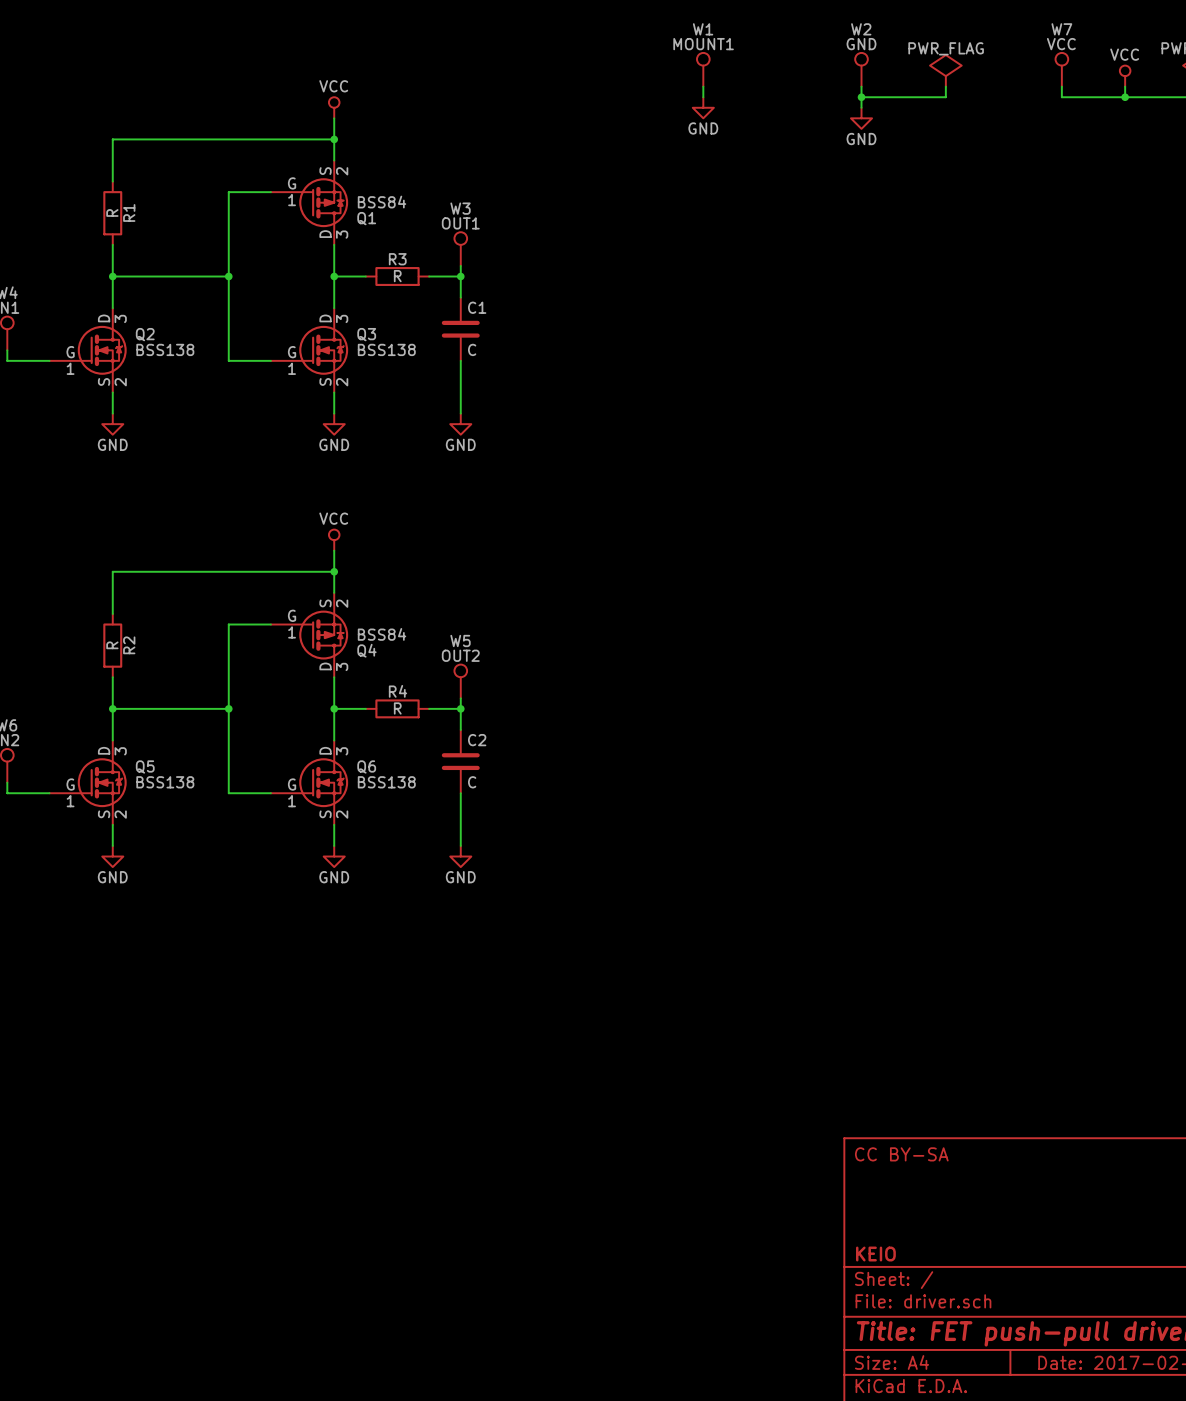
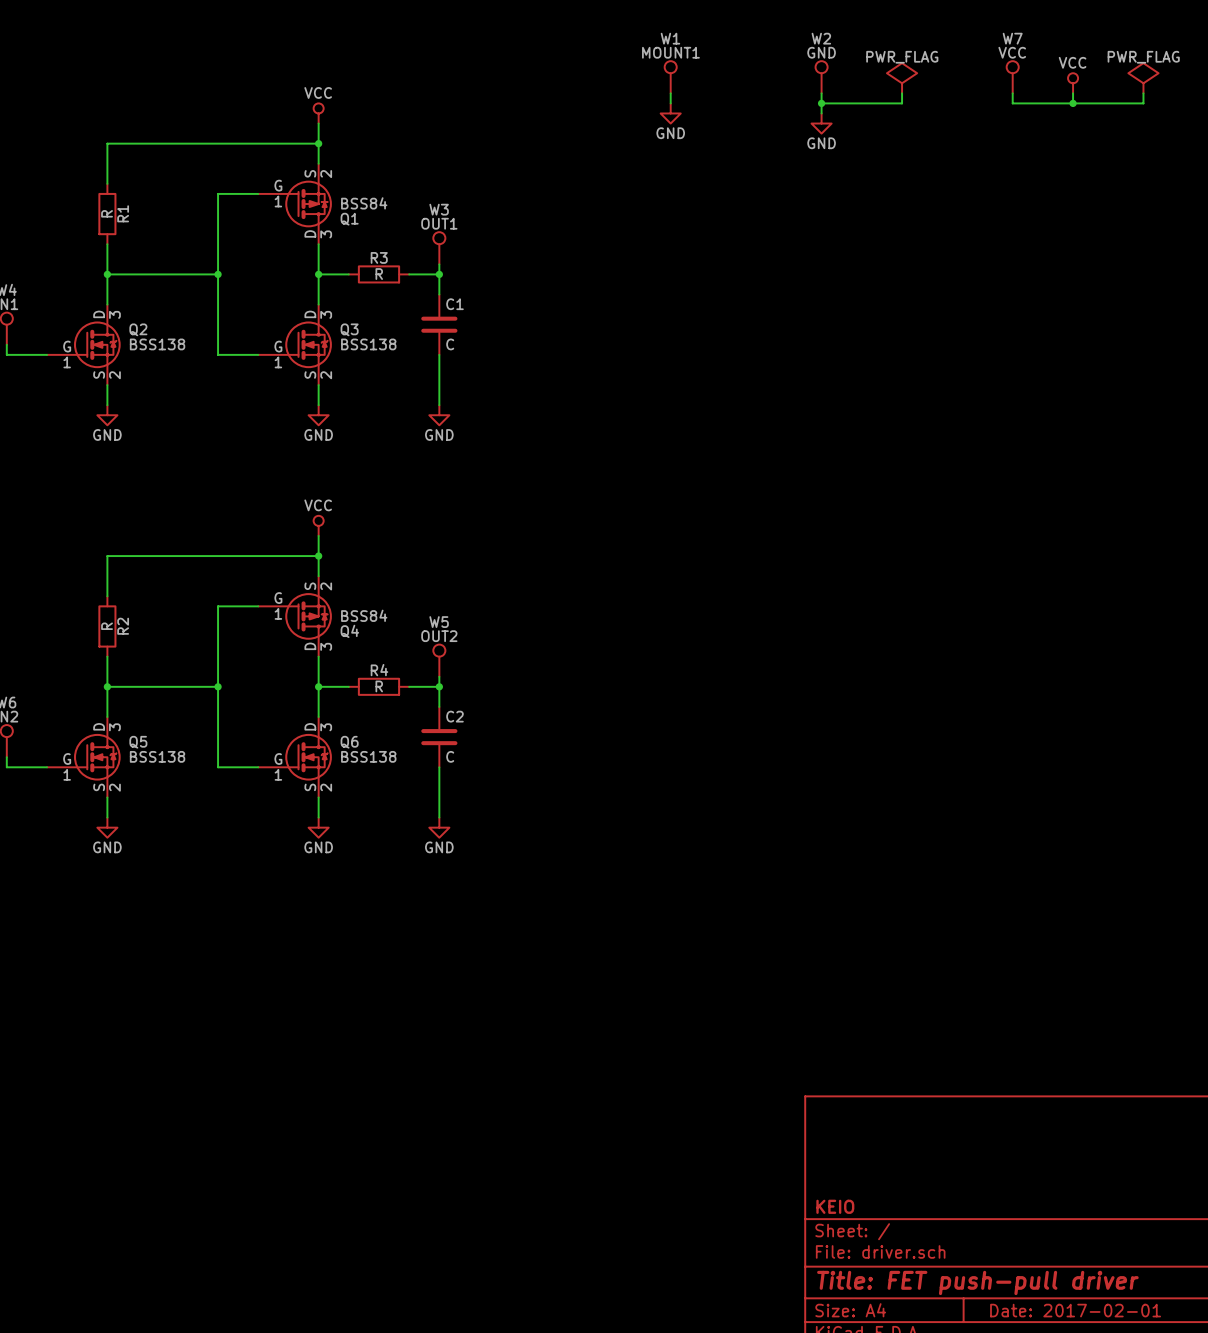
title block: CC BY-SA (901, 1154) -> none

